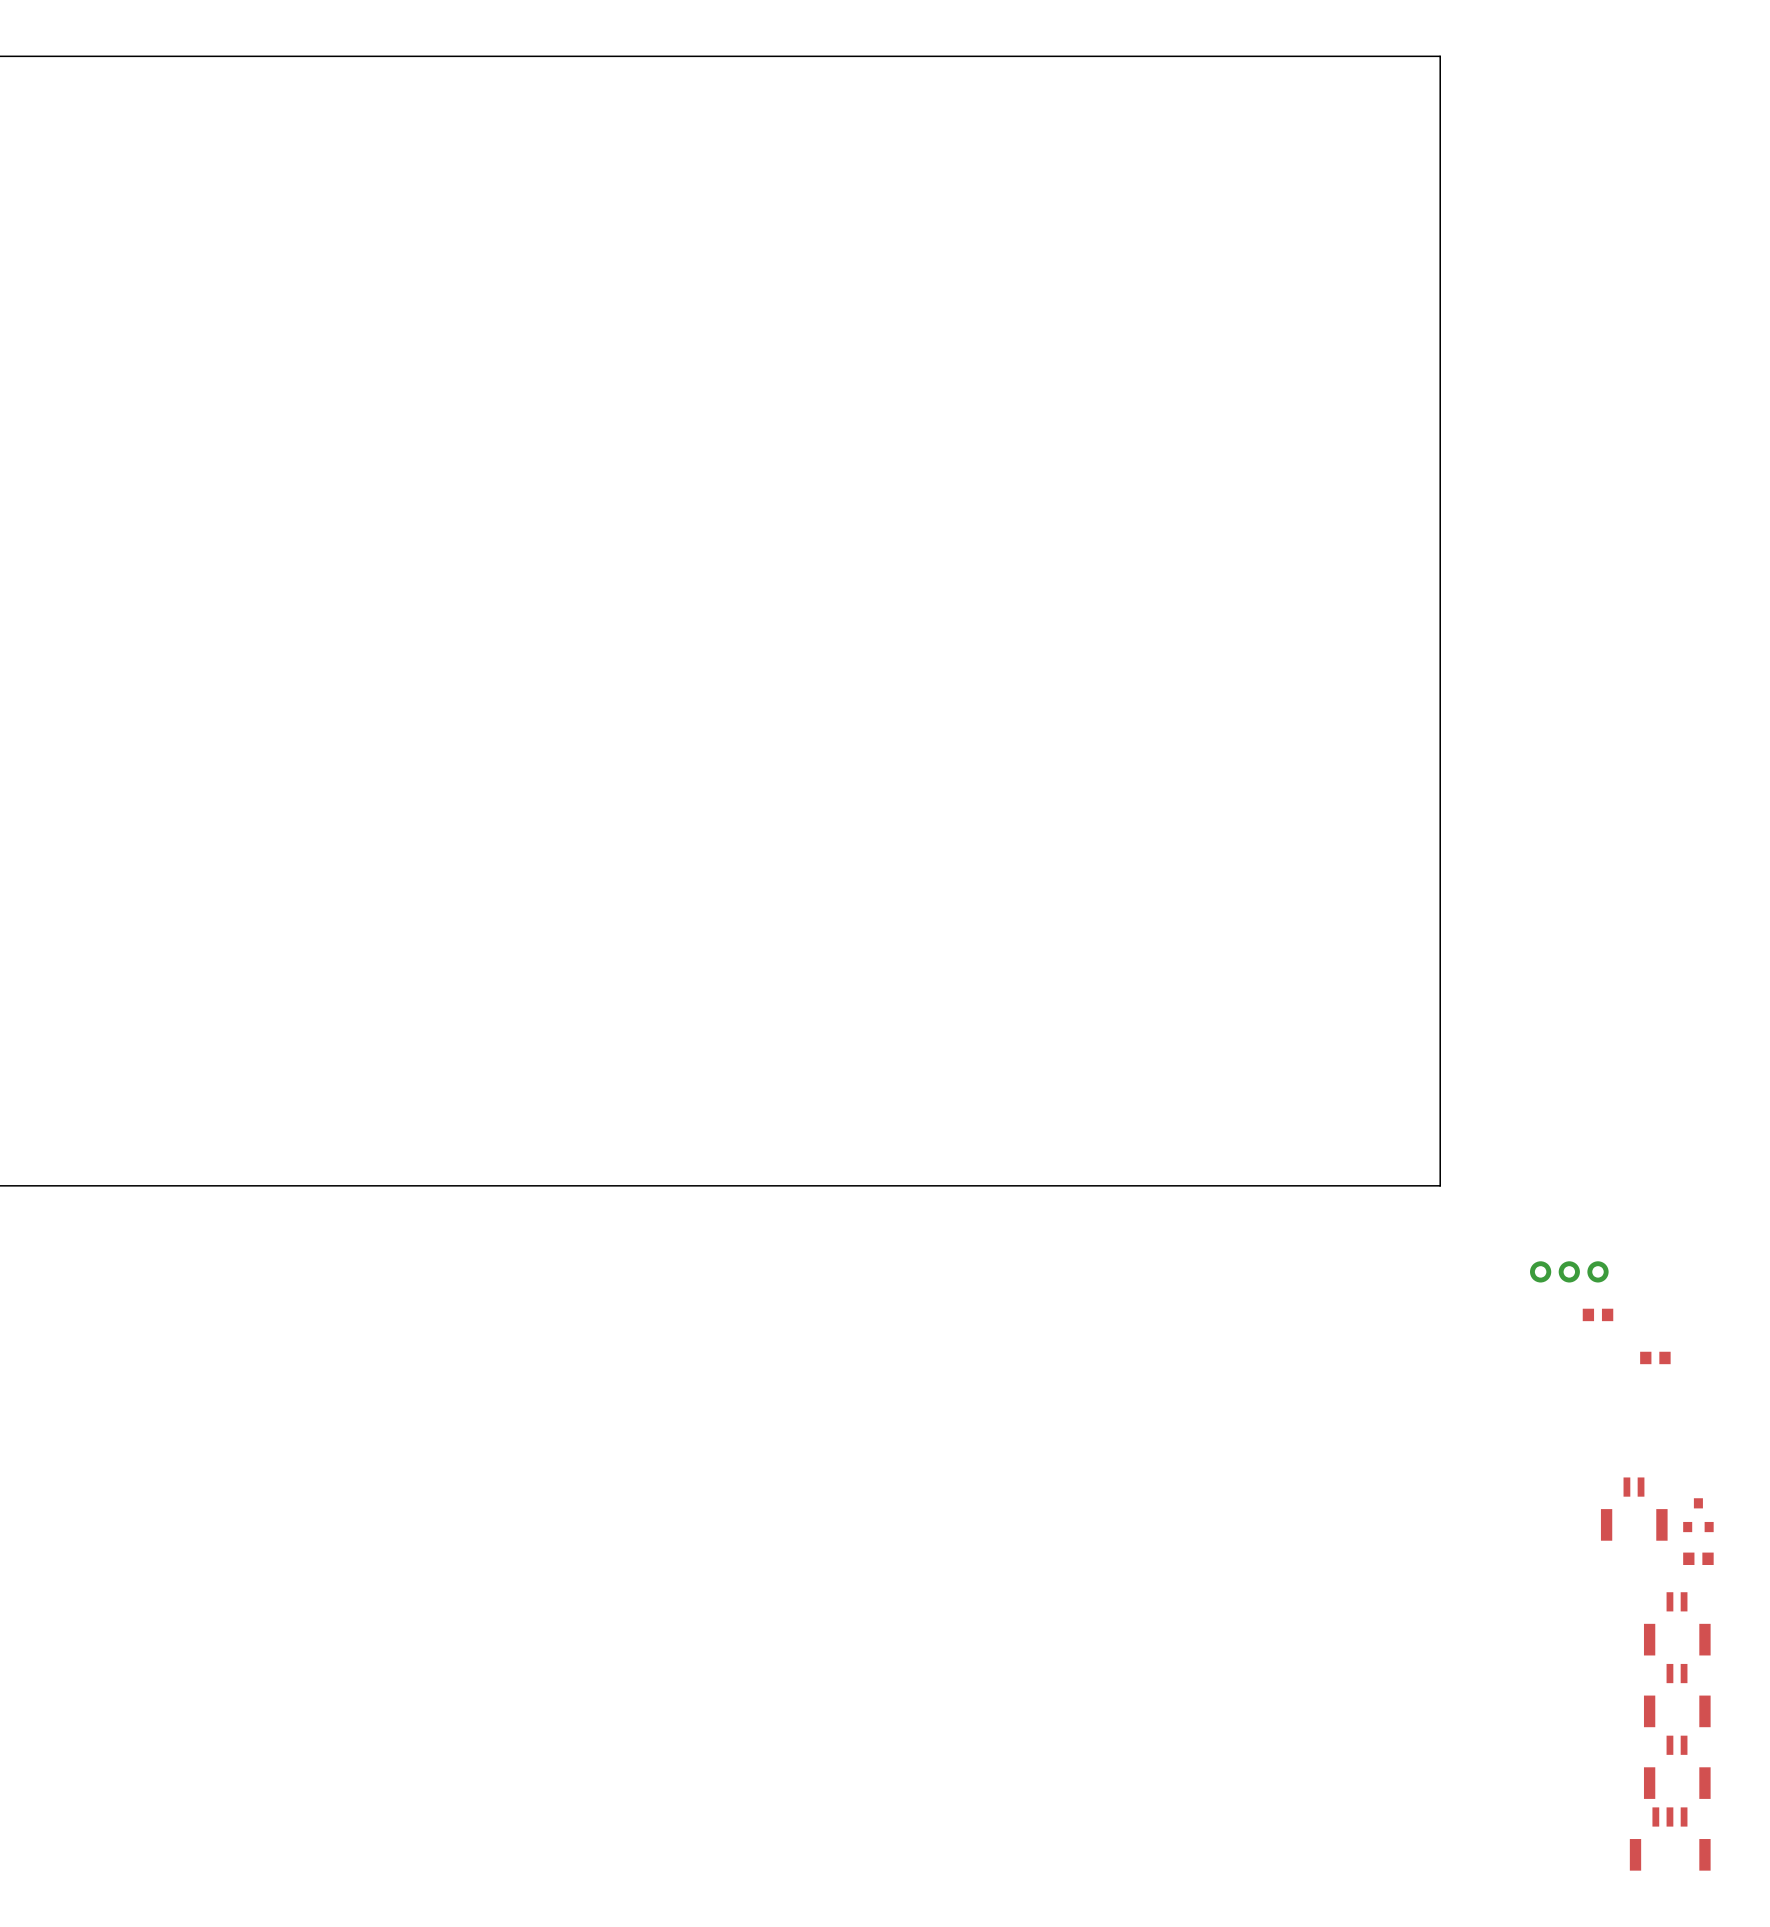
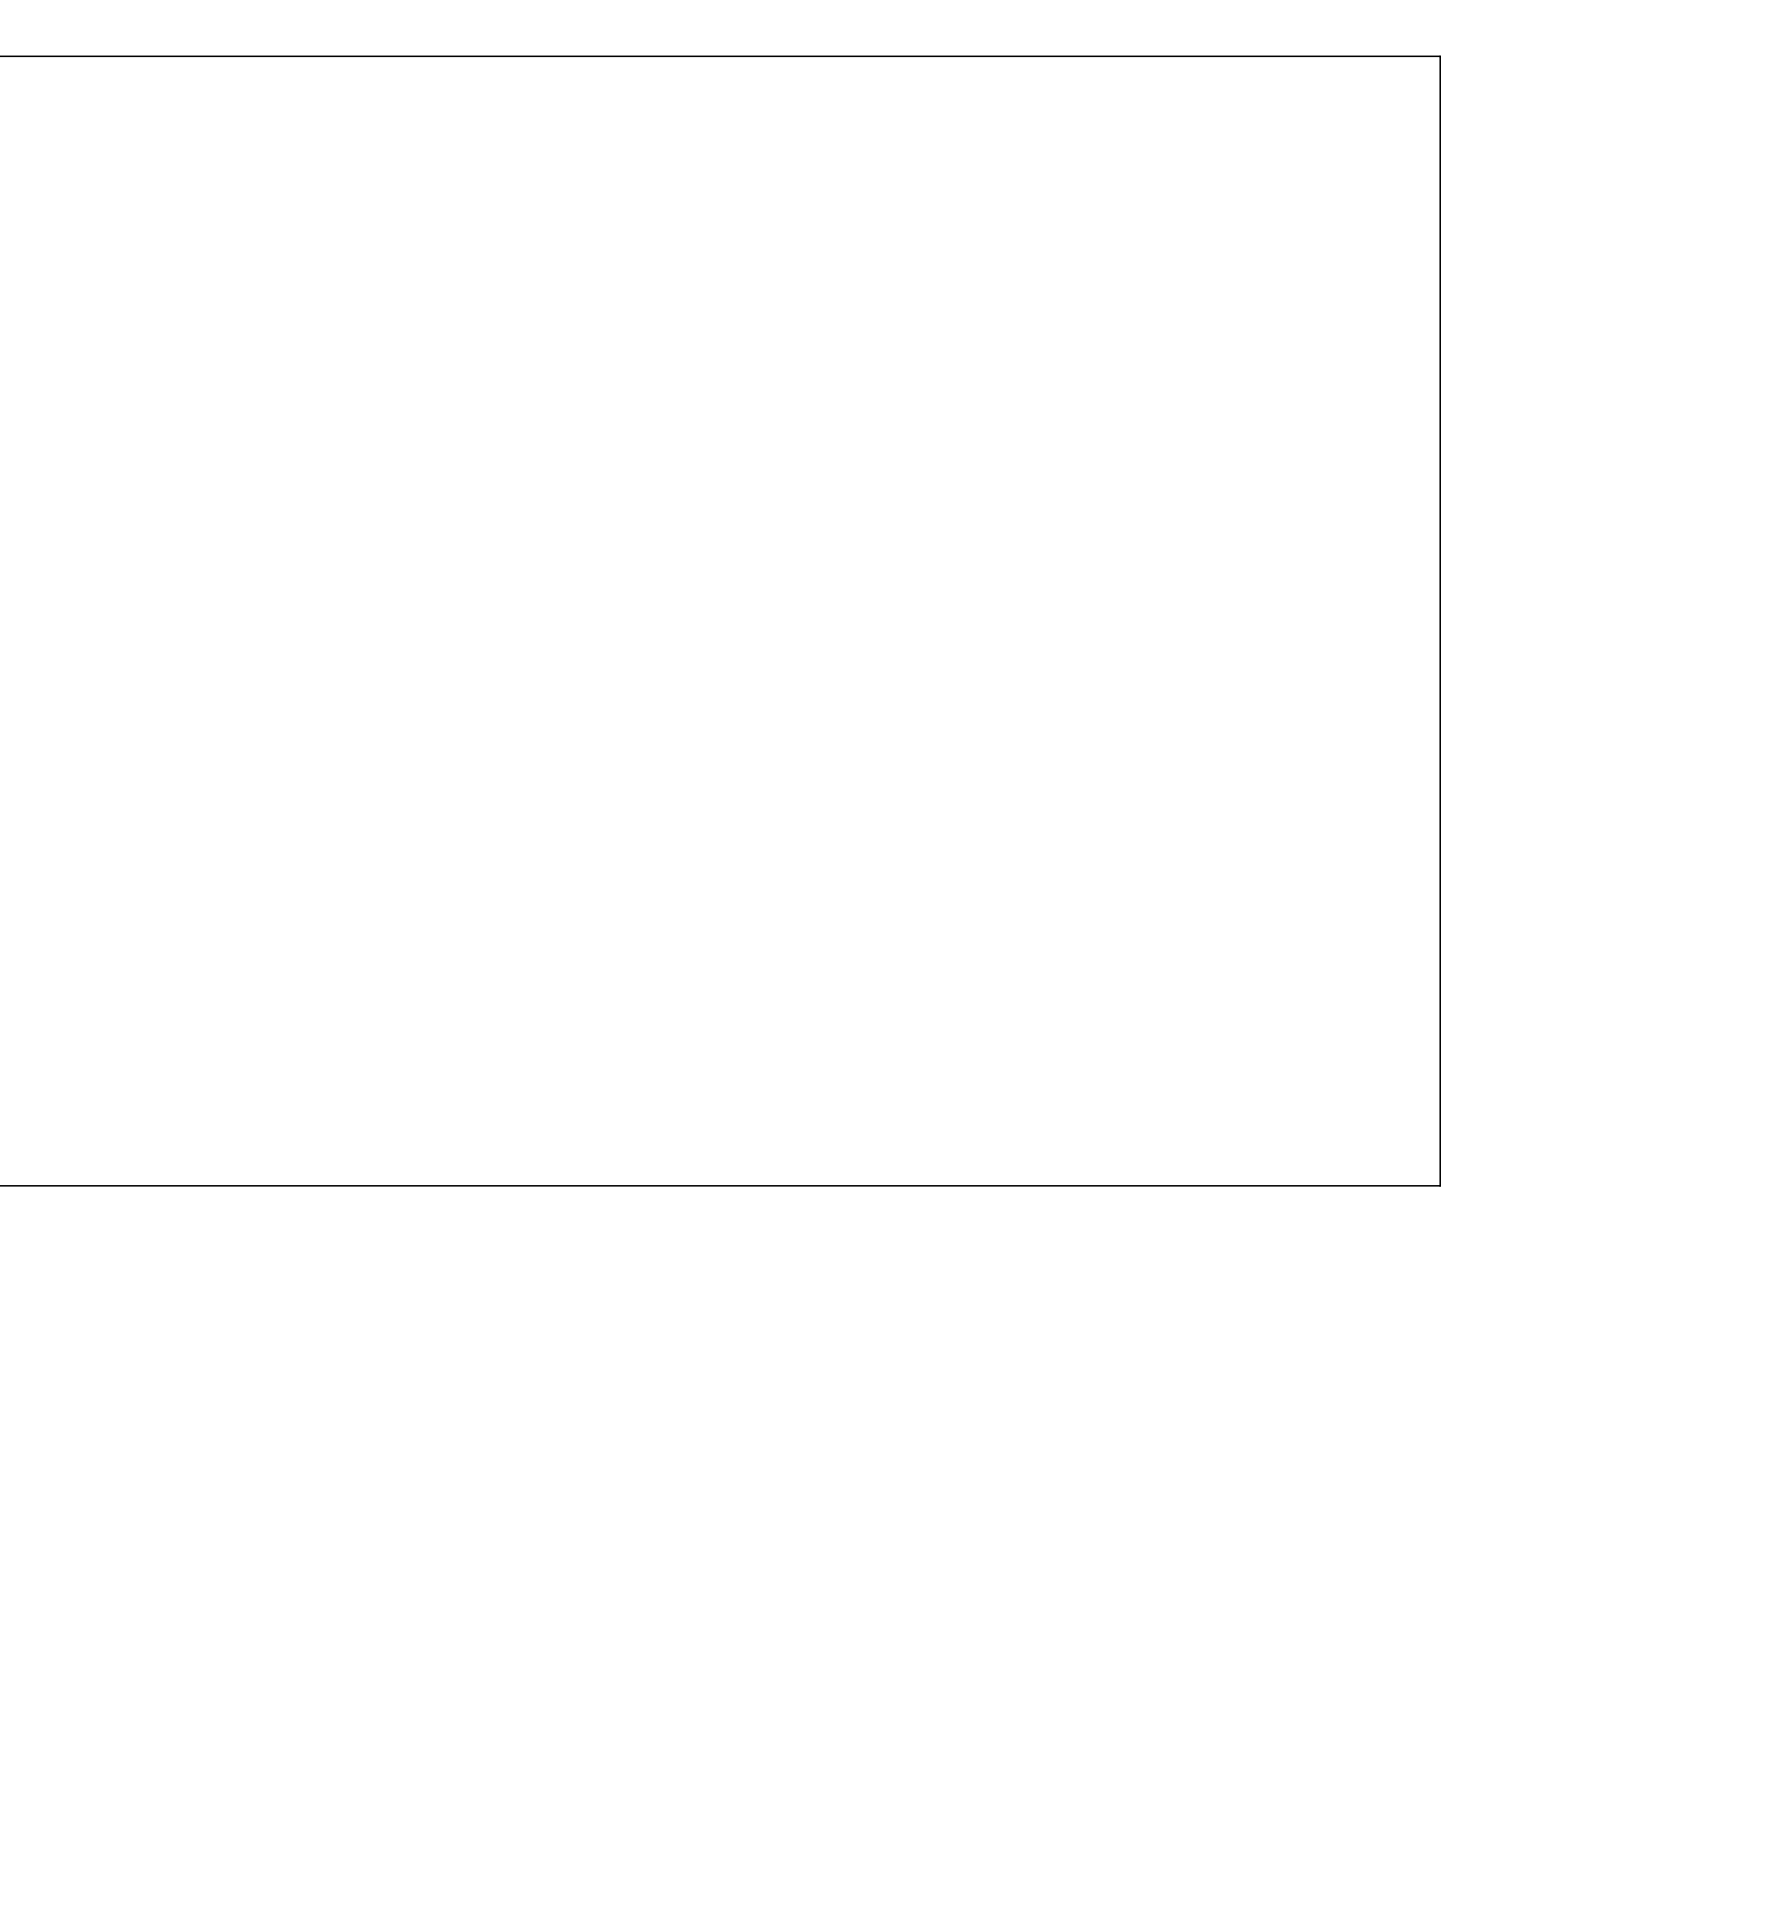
part: (1569, 1271) -> none
part: (1598, 1314) -> none
part: (1655, 1357) -> none
part: (1634, 1509) -> none
part: (1698, 1515) -> none
part: (1698, 1558) -> none
part: (1677, 1623) -> none
part: (1677, 1695) -> none
part: (1677, 1767) -> none
part: (1670, 1839) -> none

